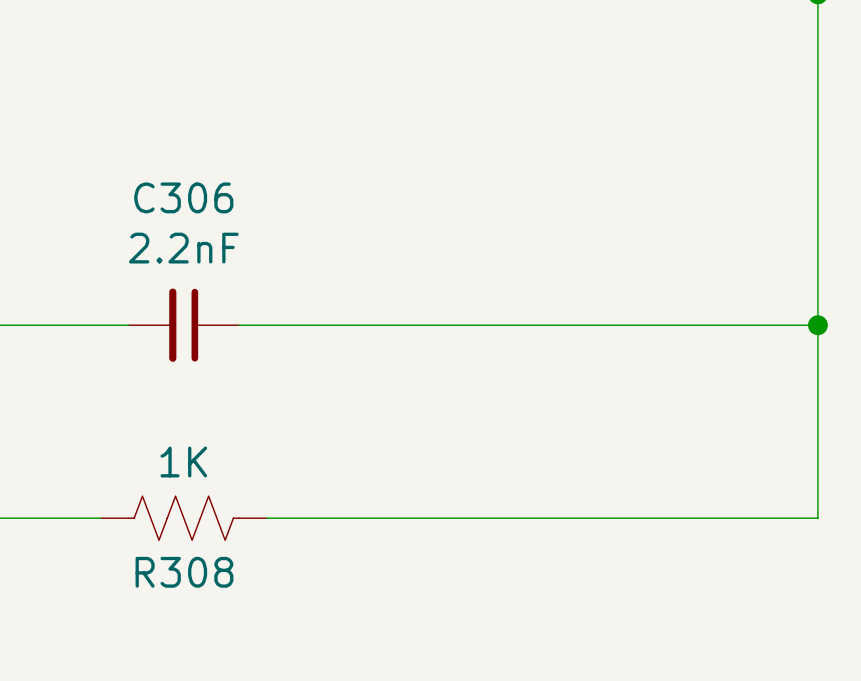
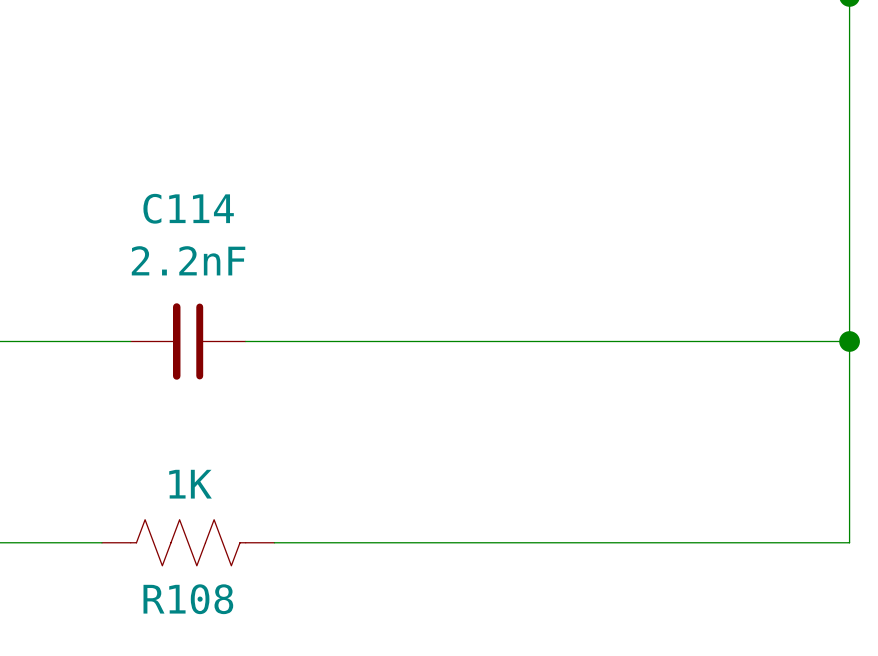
C306 name: C306 (183, 197) -> C114 (188, 208)
R308 name: R308 (184, 572) -> R108 (188, 599)

